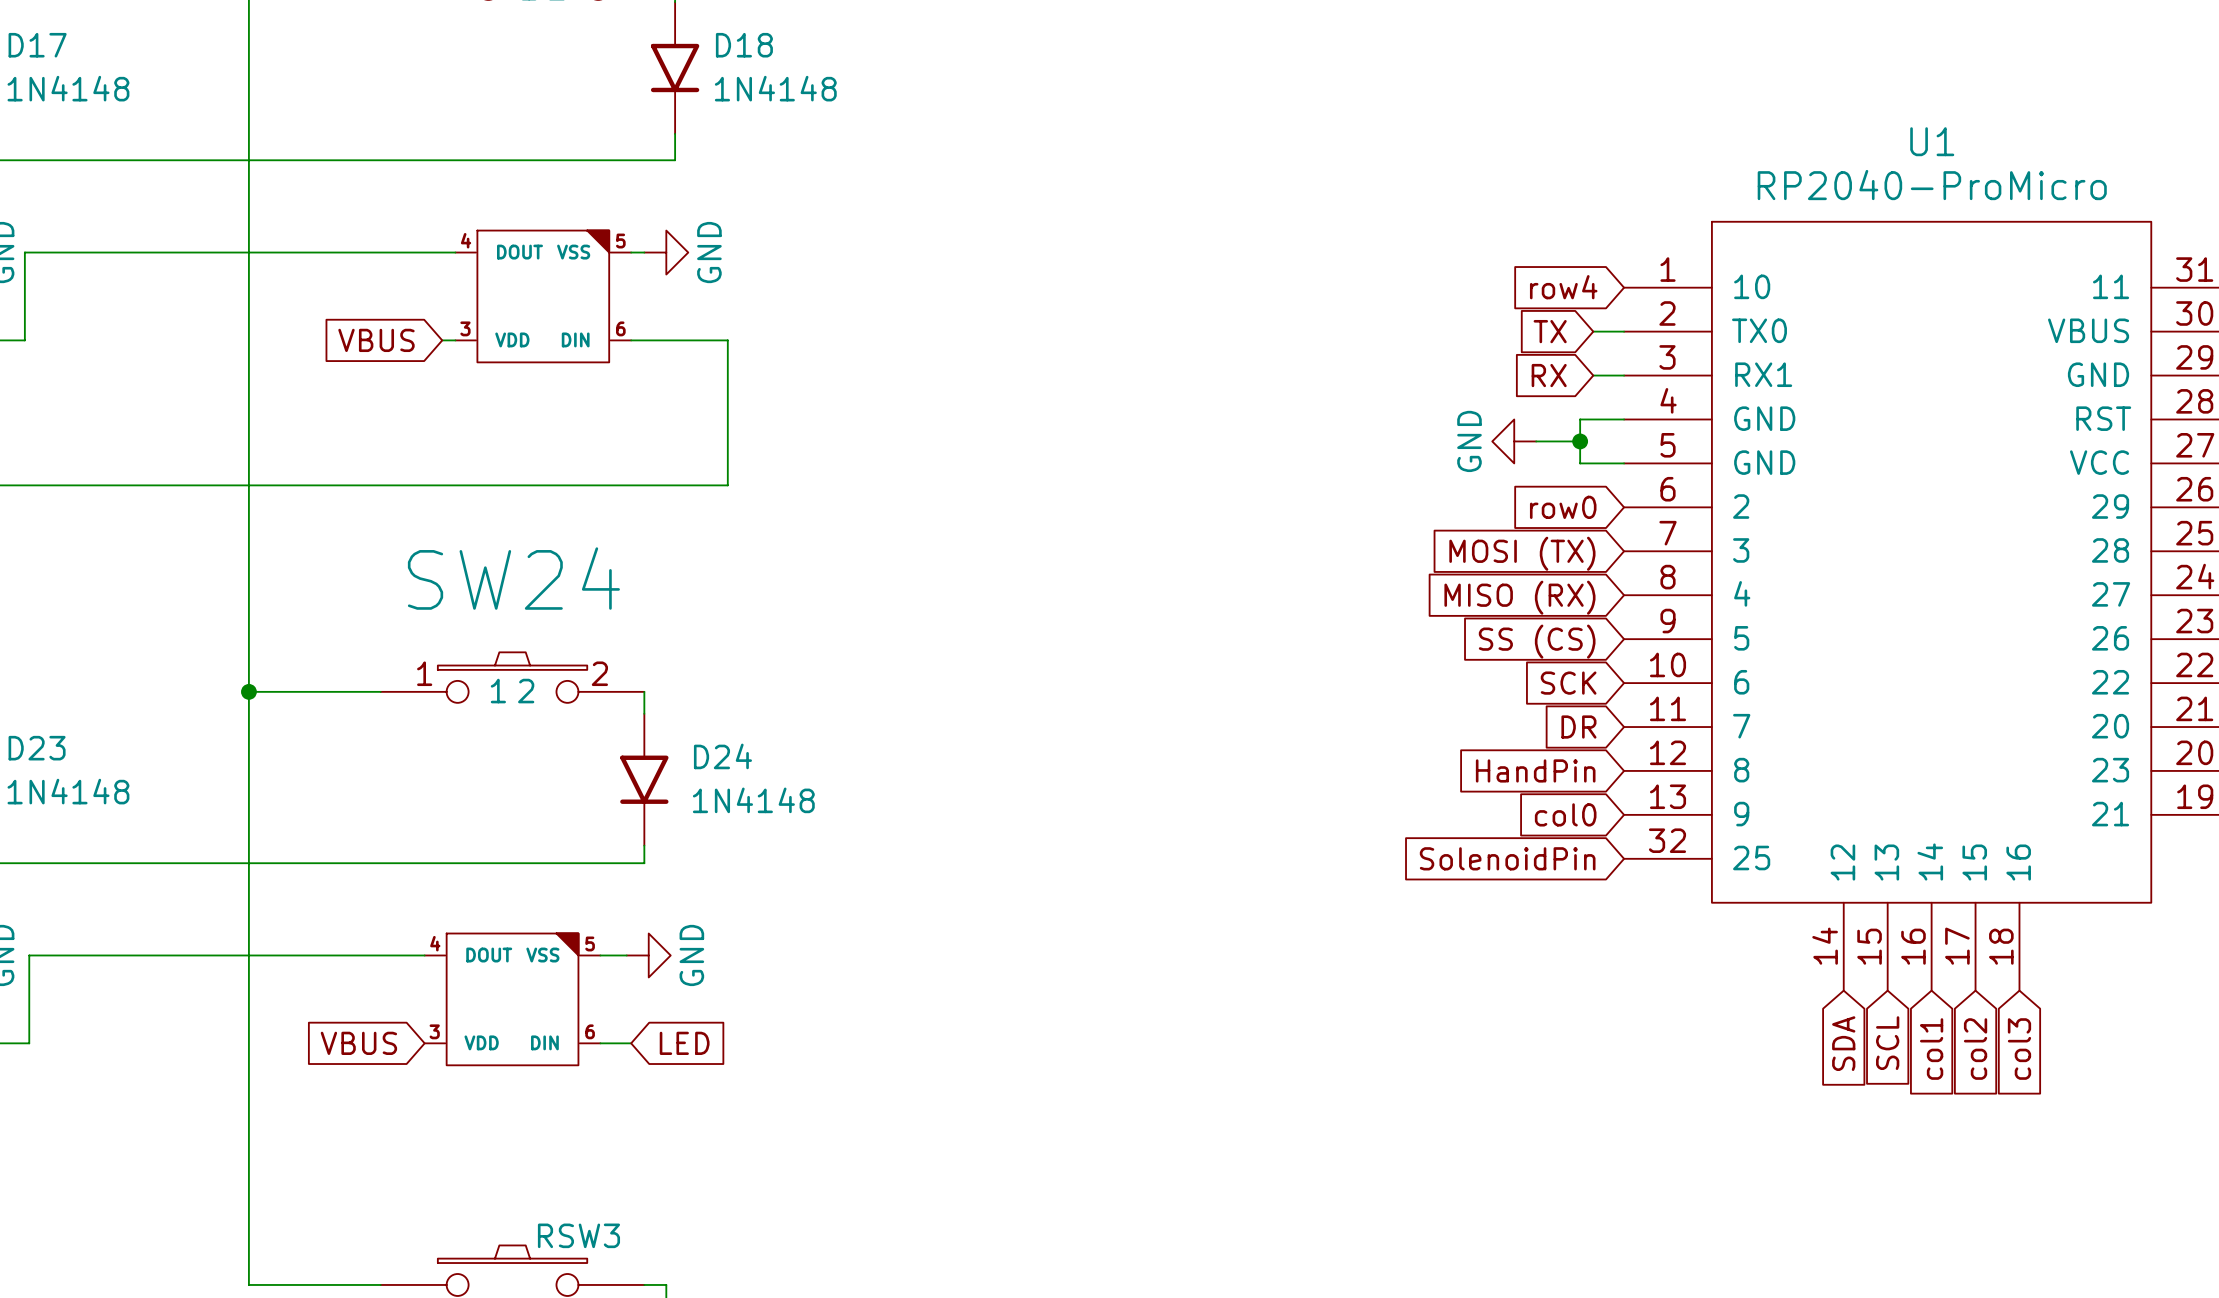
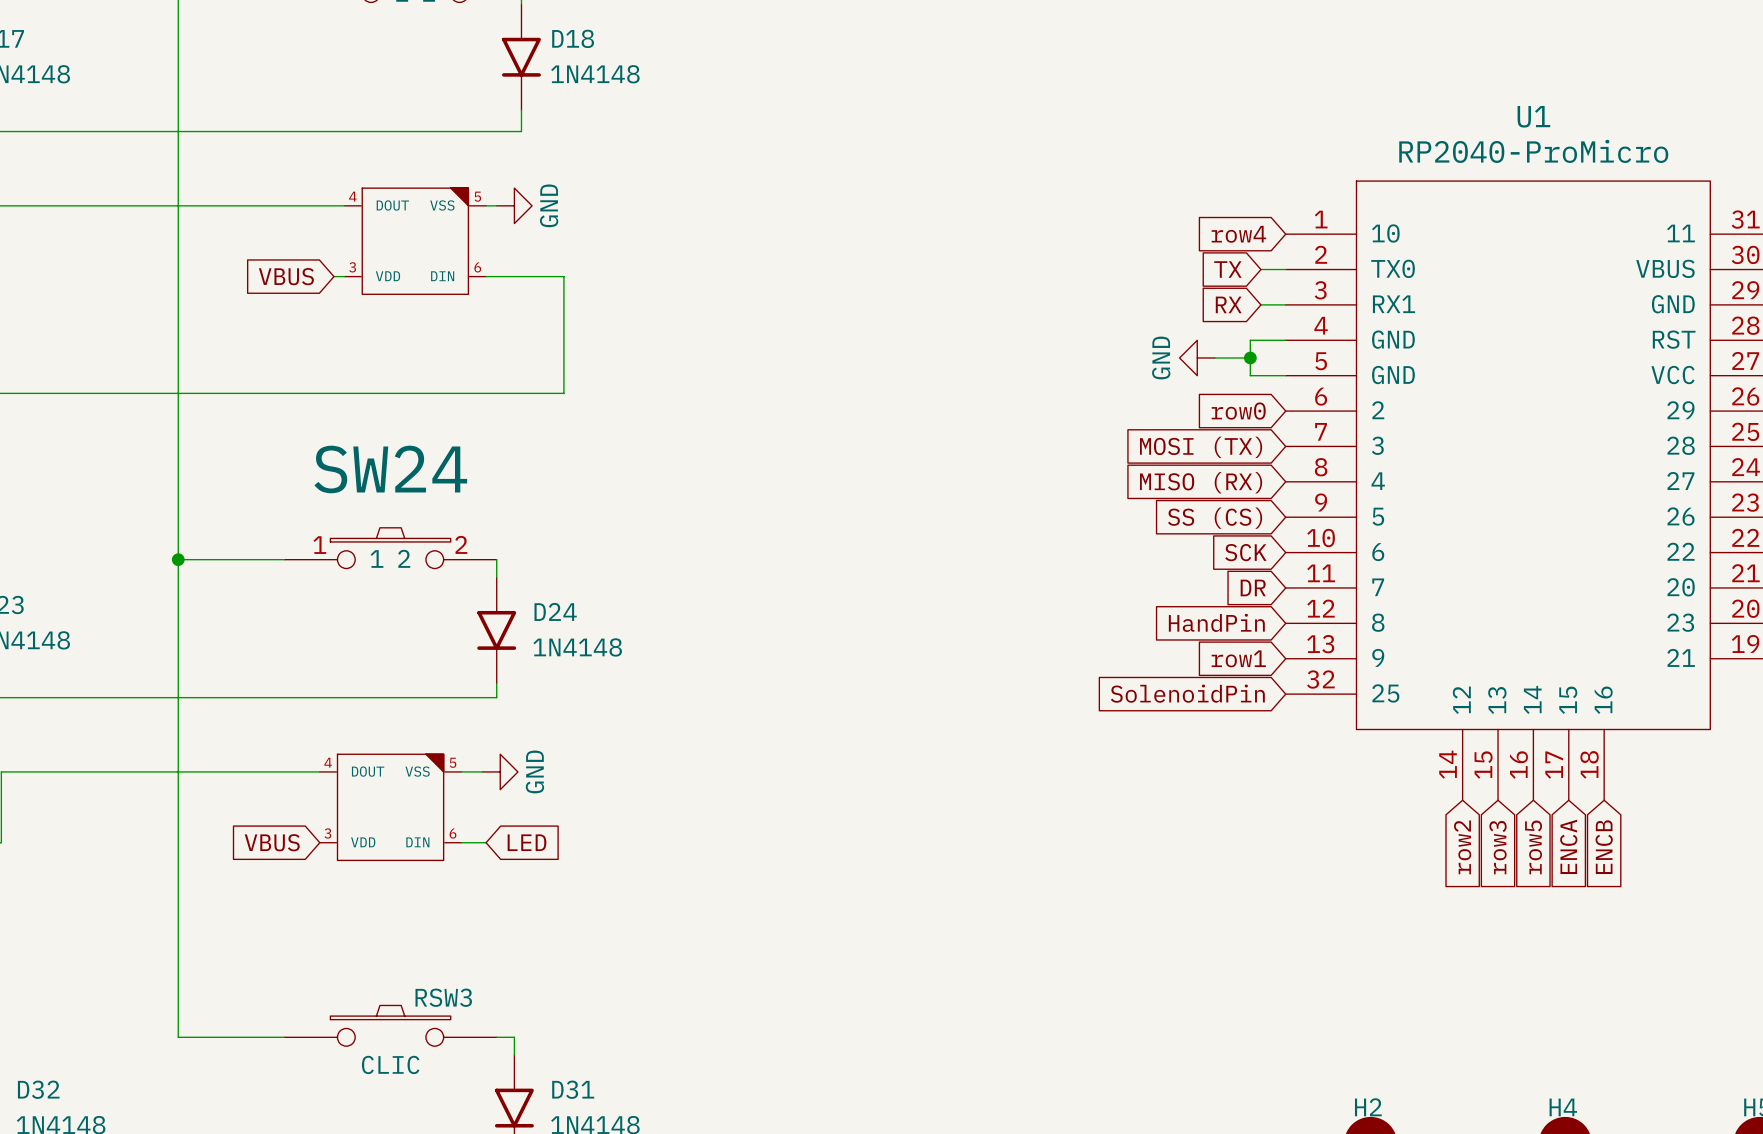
global label: col0 (1565, 814) -> row1 (1238, 658)
global label: SDA (1843, 1043) -> row2 (1462, 847)
global label: SCL (1887, 1043) -> row3 (1498, 847)
global label: col1 (1931, 1049) -> row5 (1533, 847)
global label: col2 (1975, 1049) -> ENCA (1568, 846)
global label: col3 (2019, 1049) -> ENCB (1604, 847)

